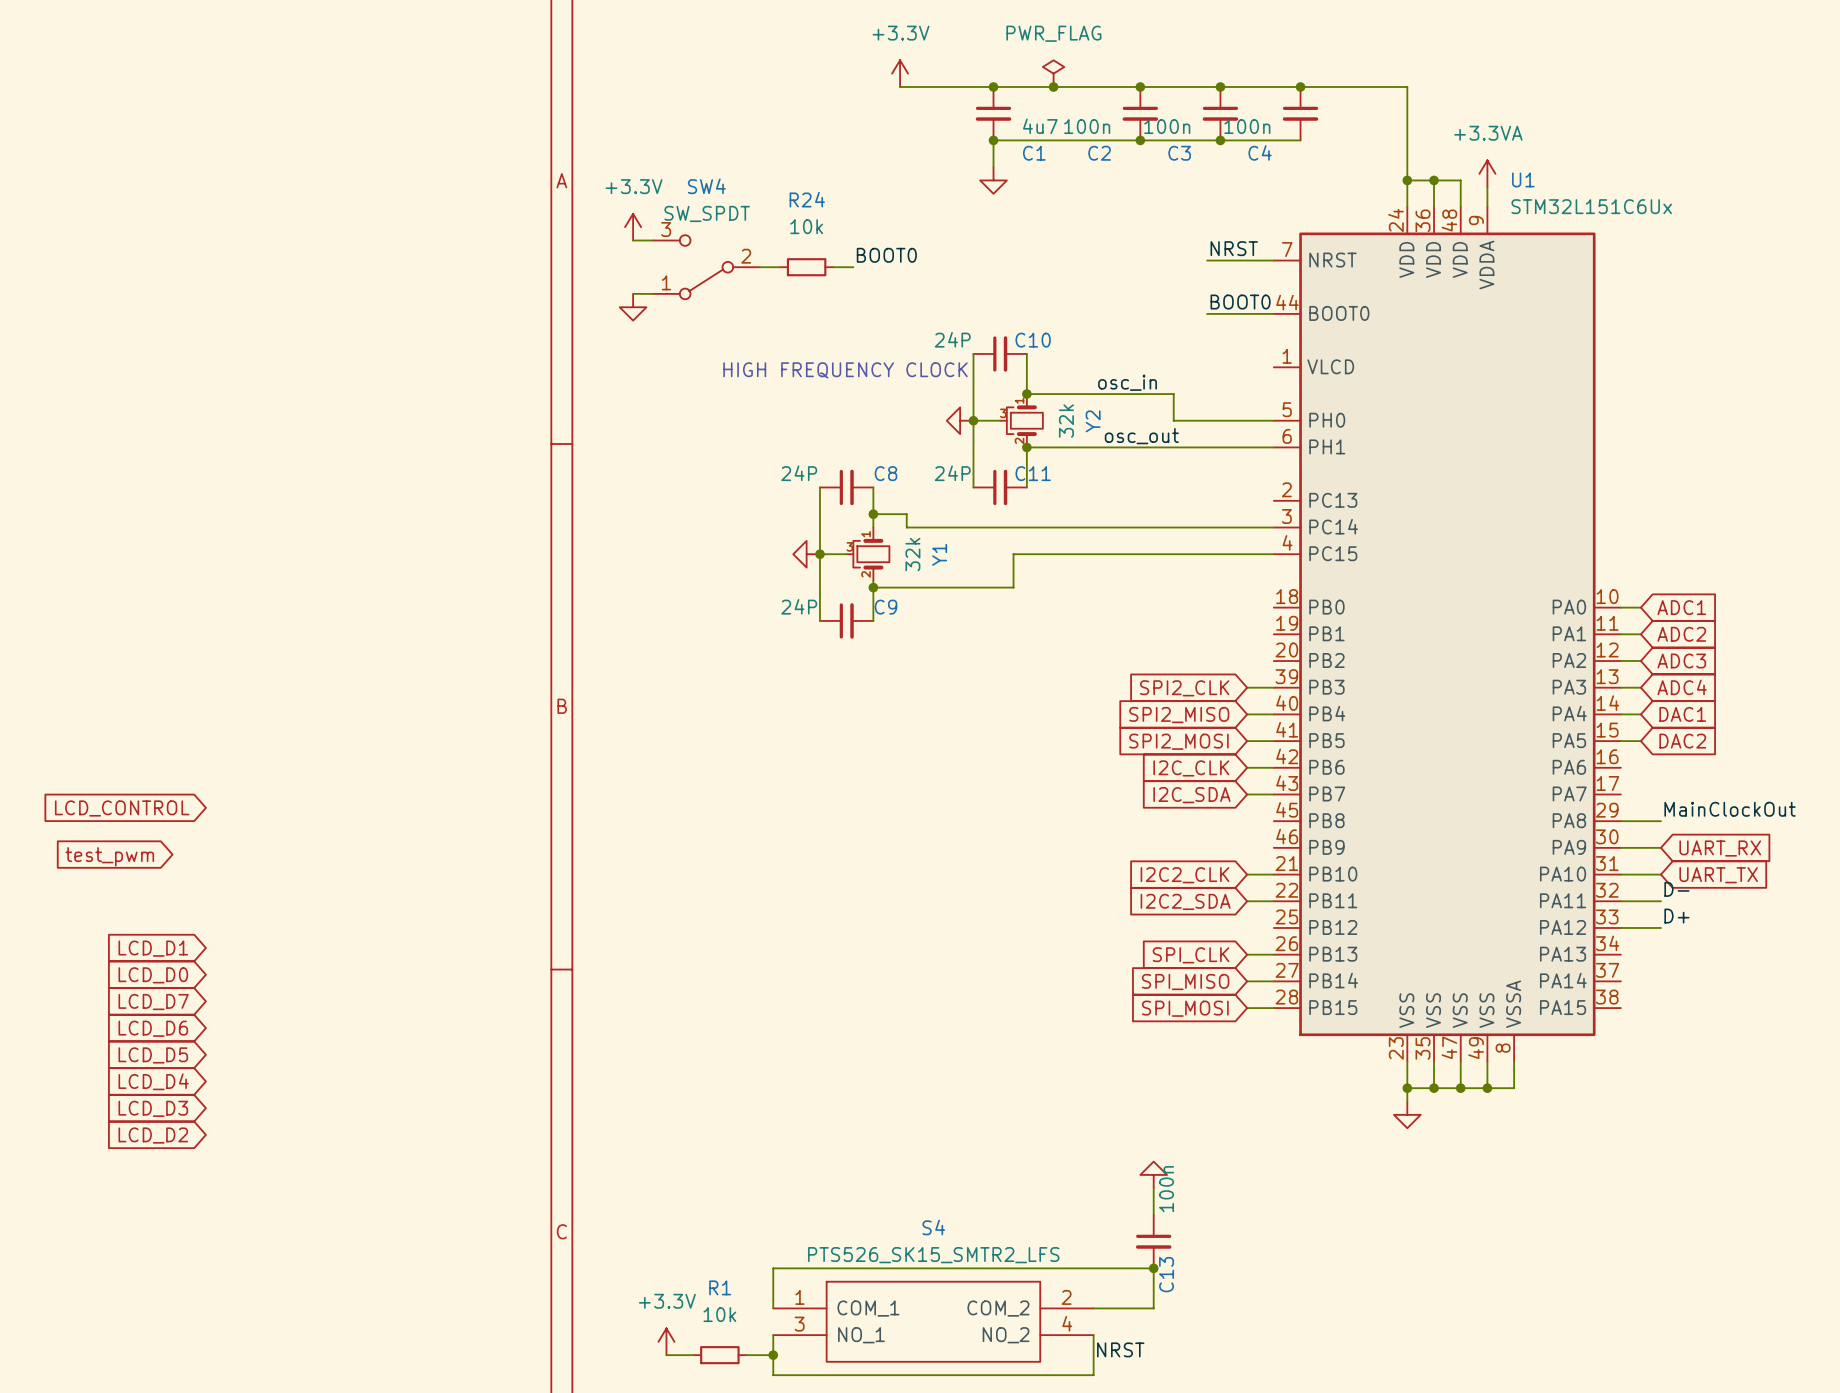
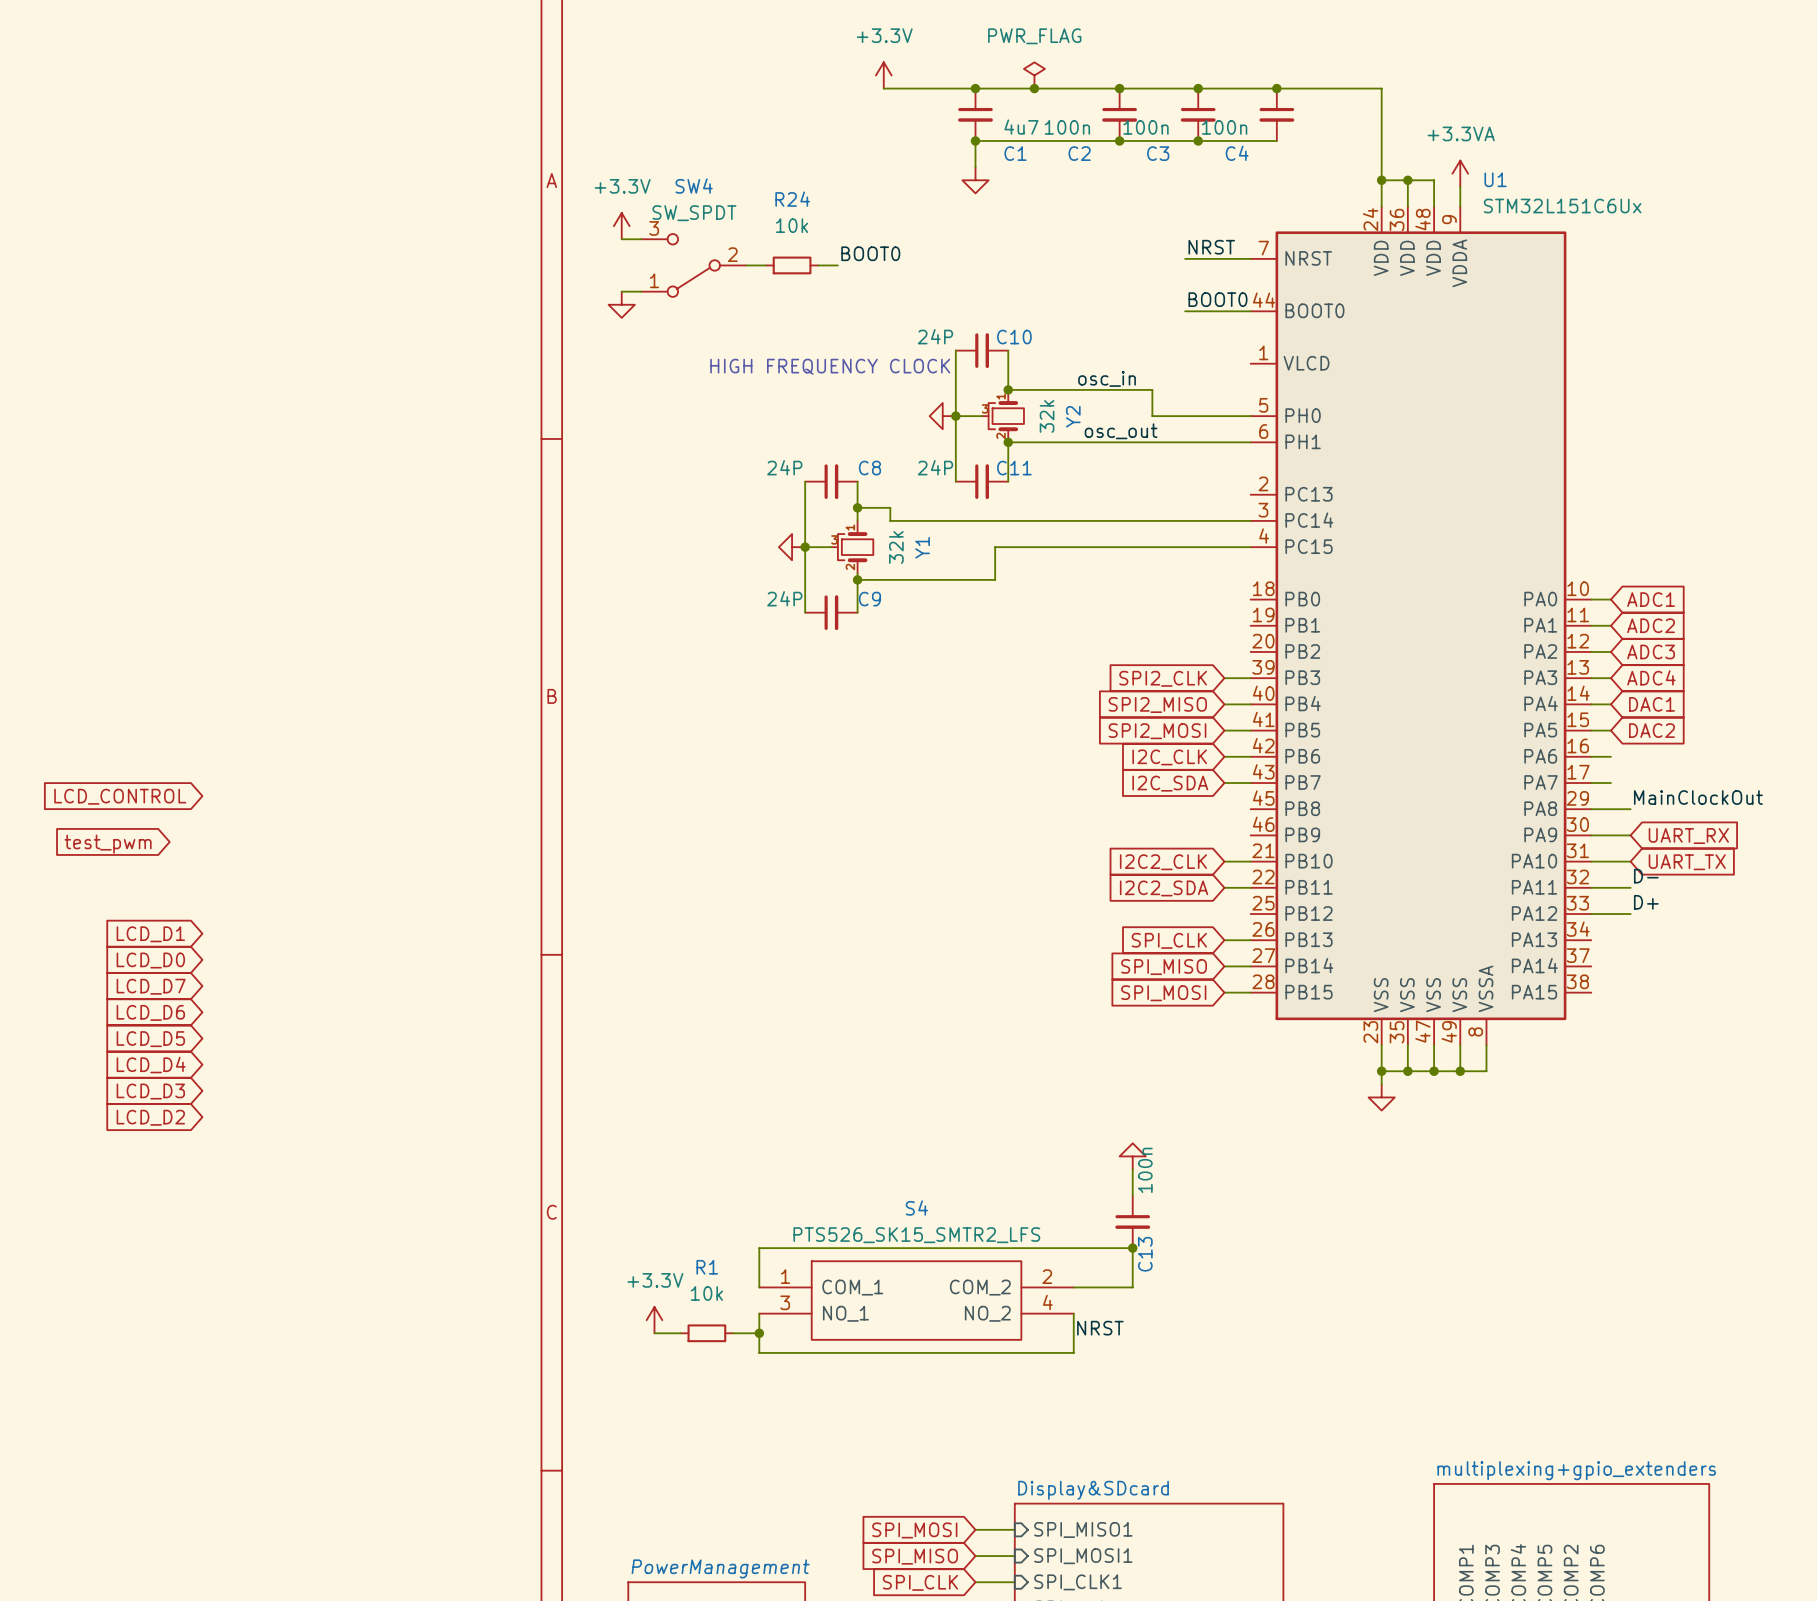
wire: none -> (1591, 756) (1610, 756)
wire: none -> (1591, 783) (1610, 783)

